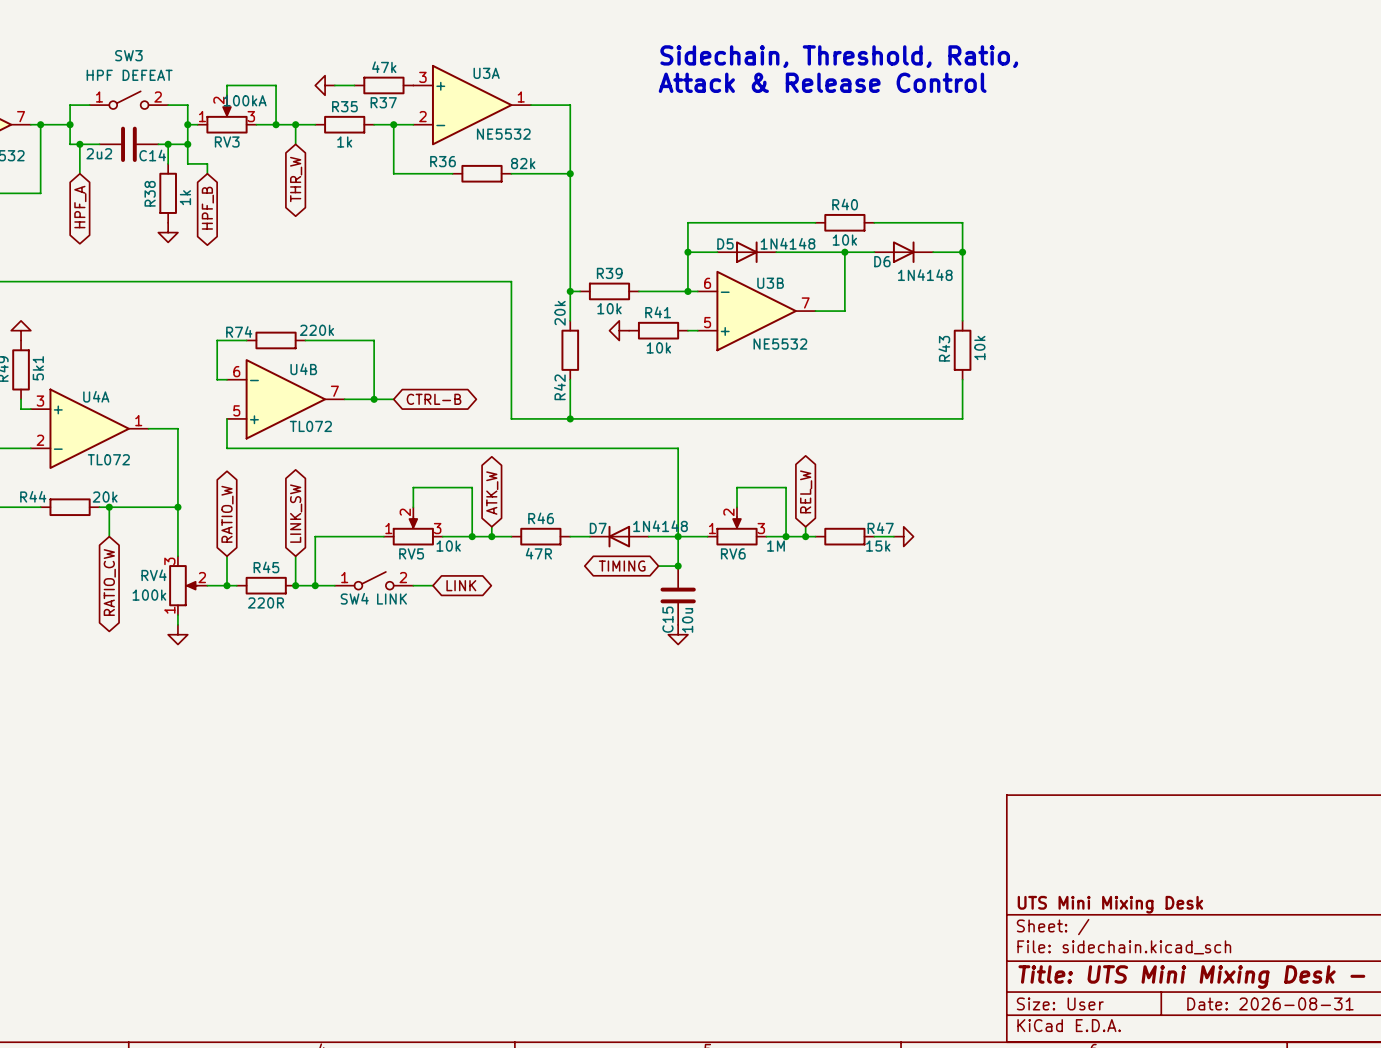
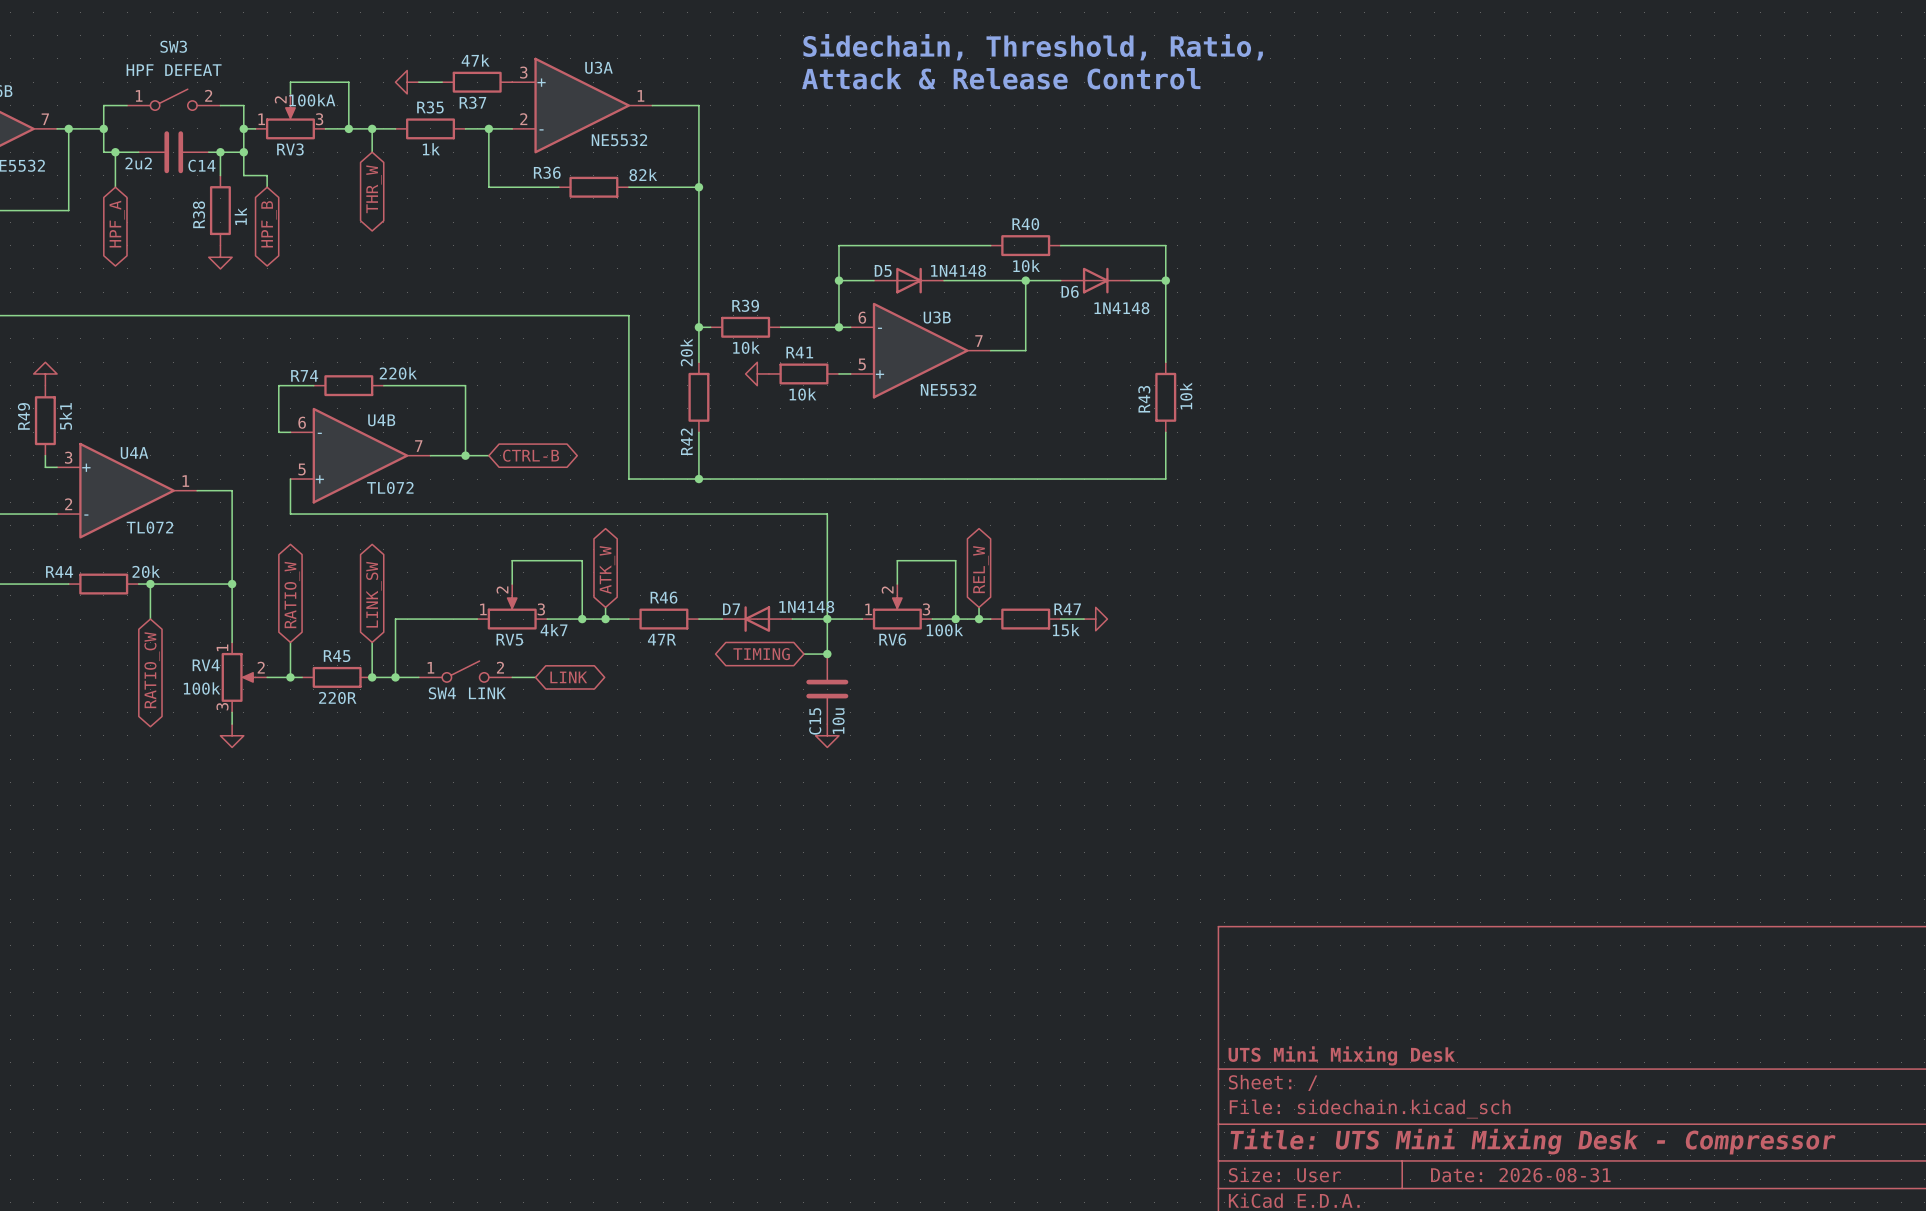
RV5 value: 10k (448, 546) -> 4k7 (554, 630)
RV6 value: 1M (776, 546) -> 100k (944, 630)
RV4 flip: as is (183, 585) -> up-down (238, 677)

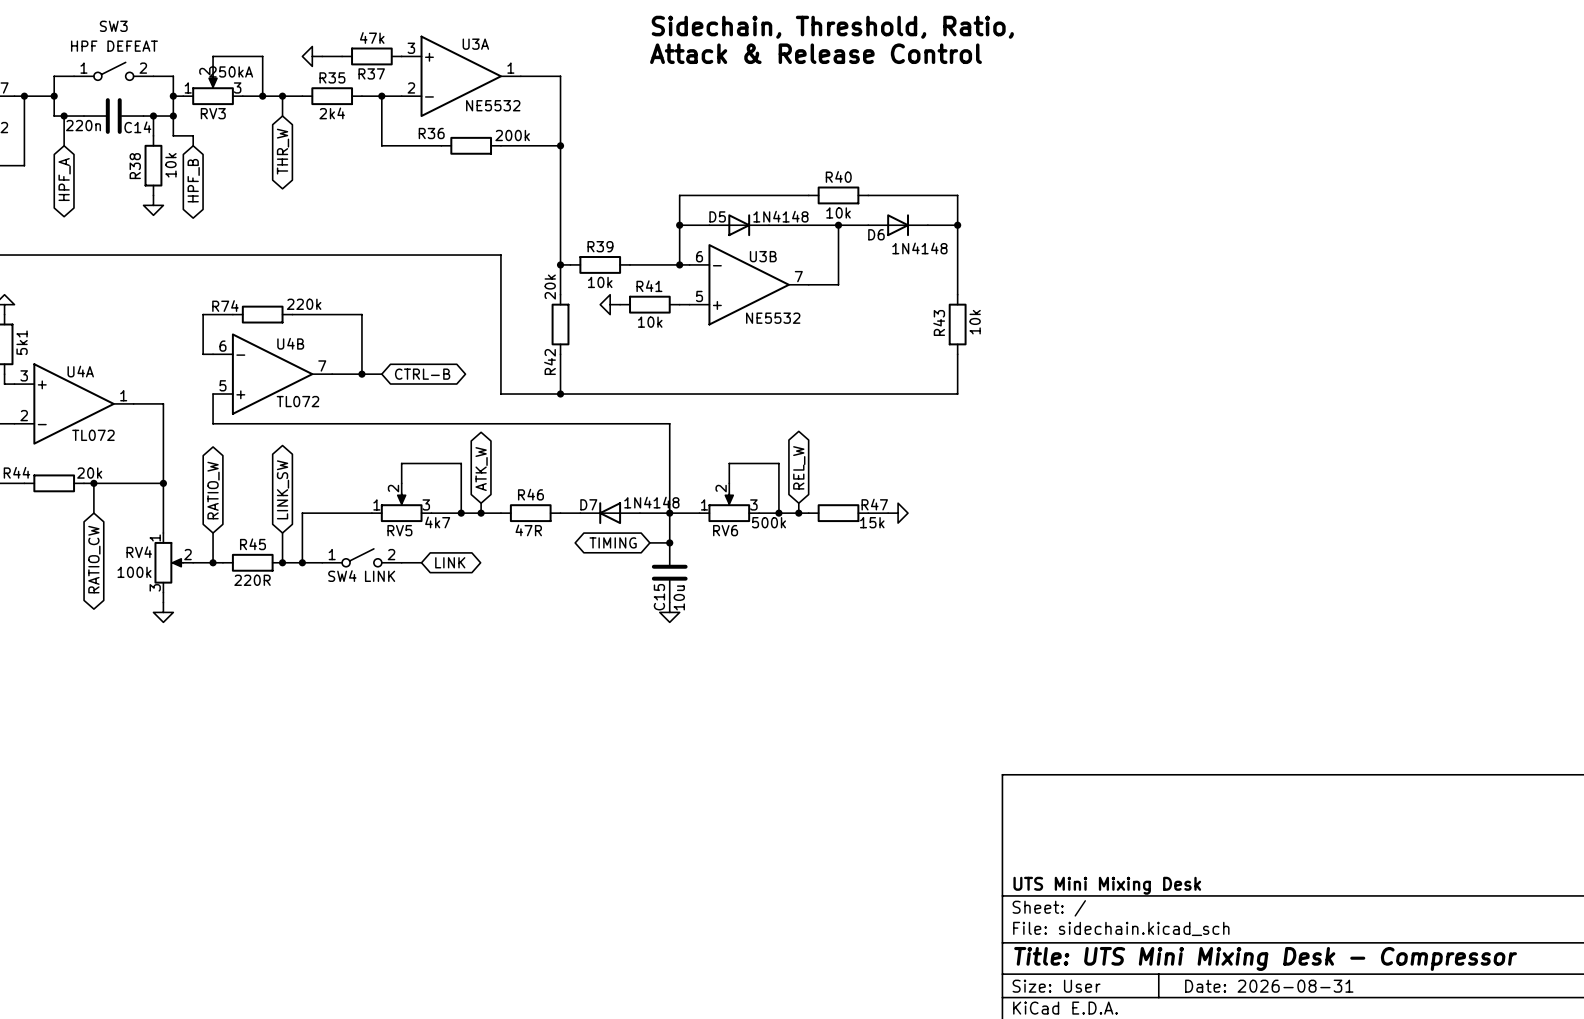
RV3 value: 100kA (312, 100) -> 250kA (231, 71)
R35 value: 1k (431, 149) -> 2k4 (332, 113)
C14 value: 2u2 (138, 163) -> 220n (83, 125)
R36 value: 82k (643, 175) -> 200k (512, 135)
R38 value: 1k (240, 216) -> 10k (170, 165)
RV6 value: 100k (944, 630) -> 500k (769, 522)

